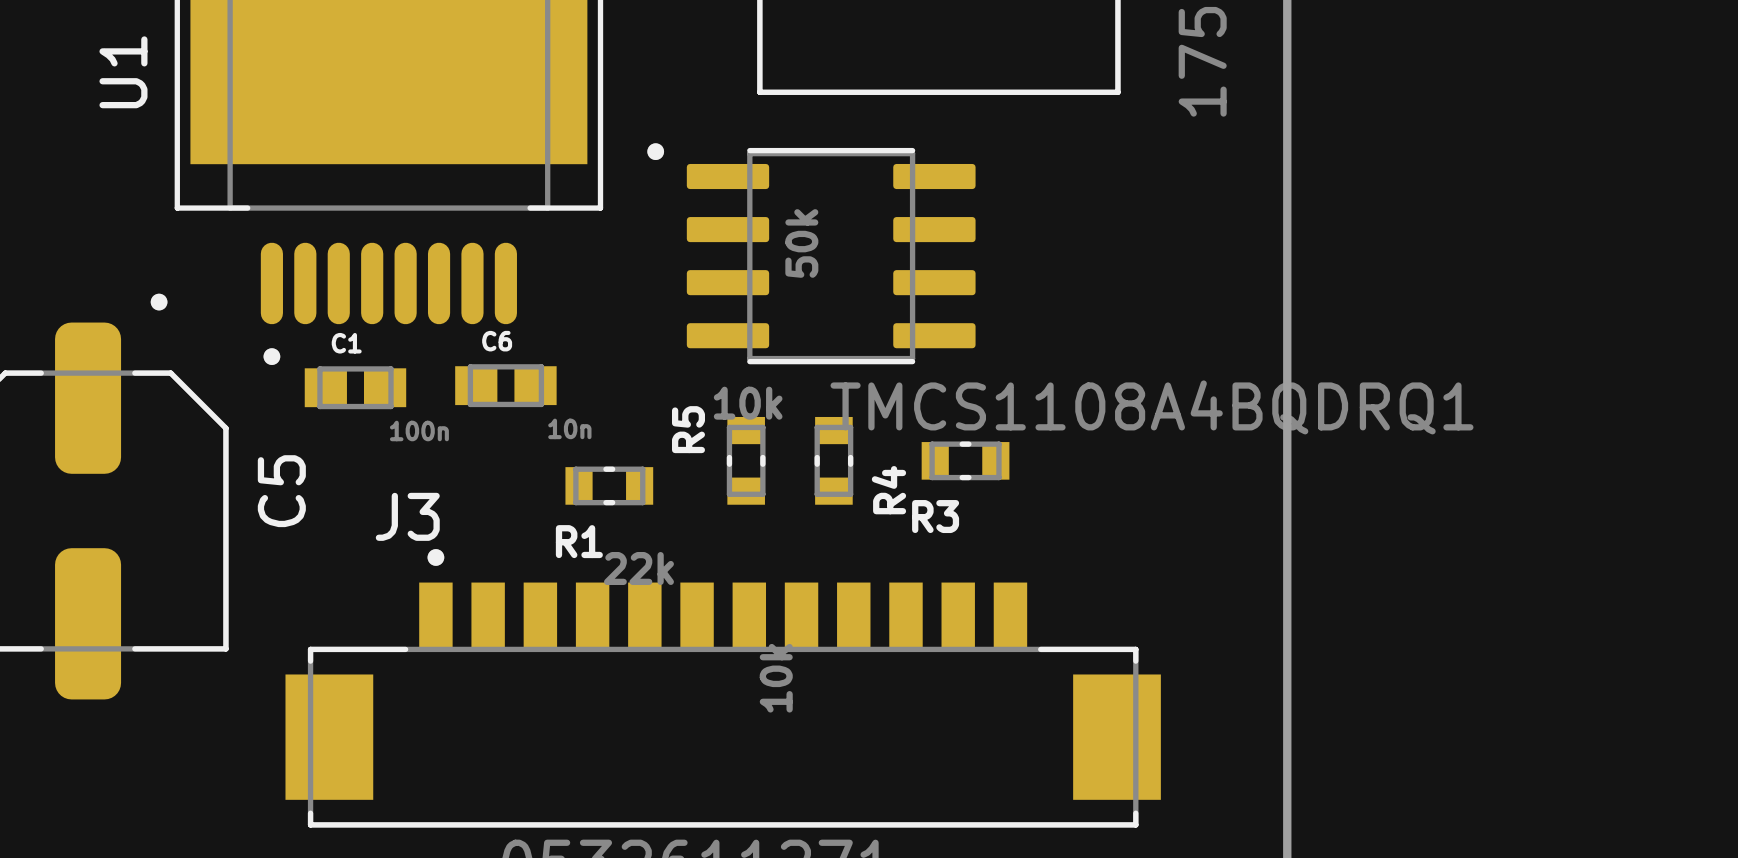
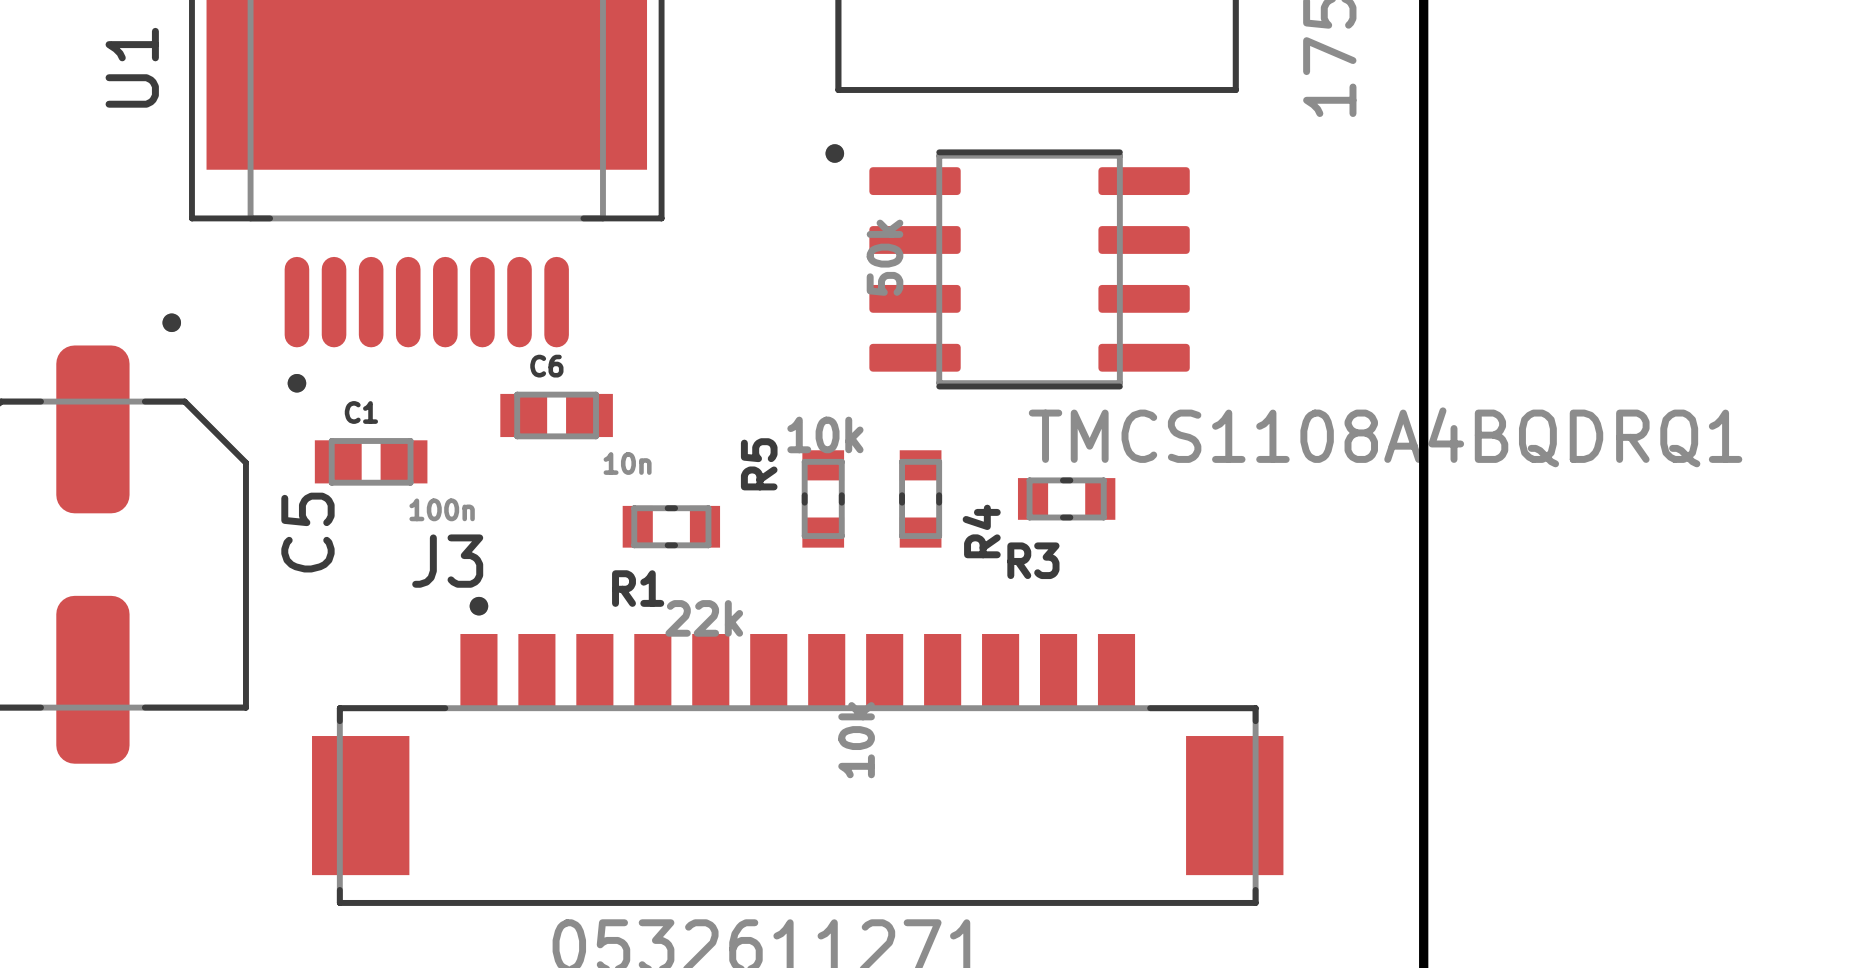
part position: (811, 253) -> (1007, 266)
C1 position: (355, 387) -> (371, 461)

